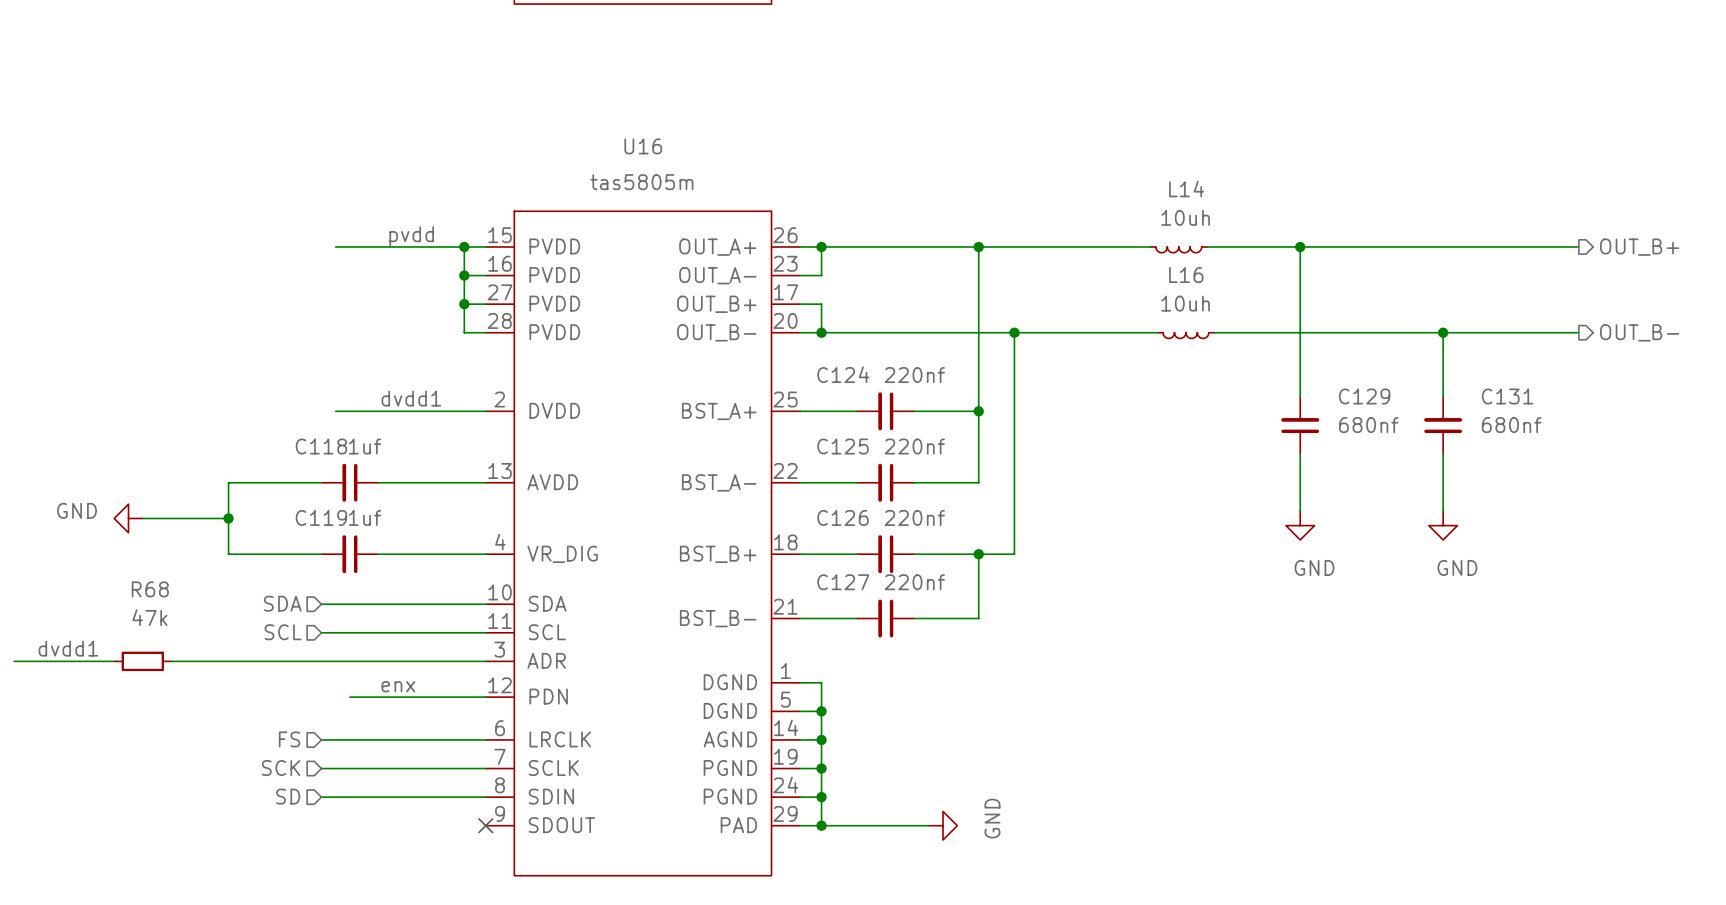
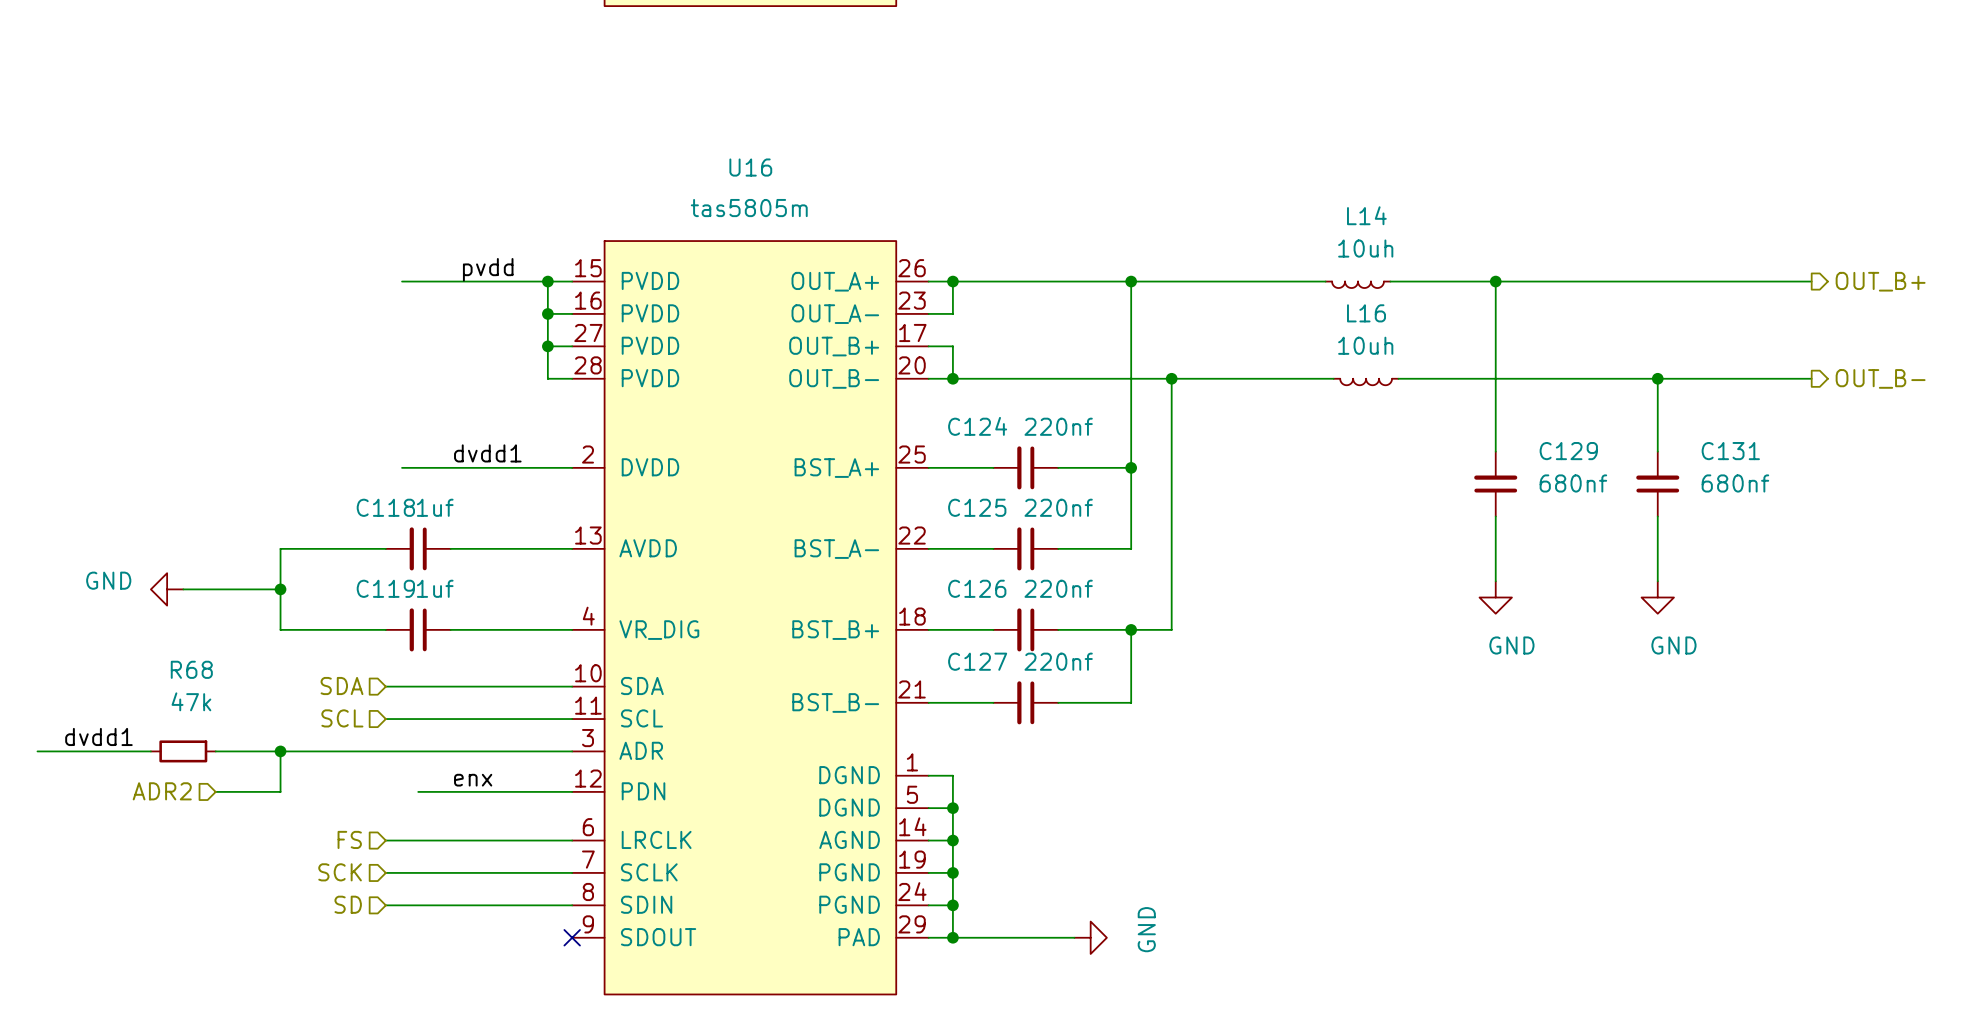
wire: none -> (280, 751) (280, 791) (215, 791)
junction: none -> (280, 751)
hierarchical label: none -> ADR2 (162, 791)

